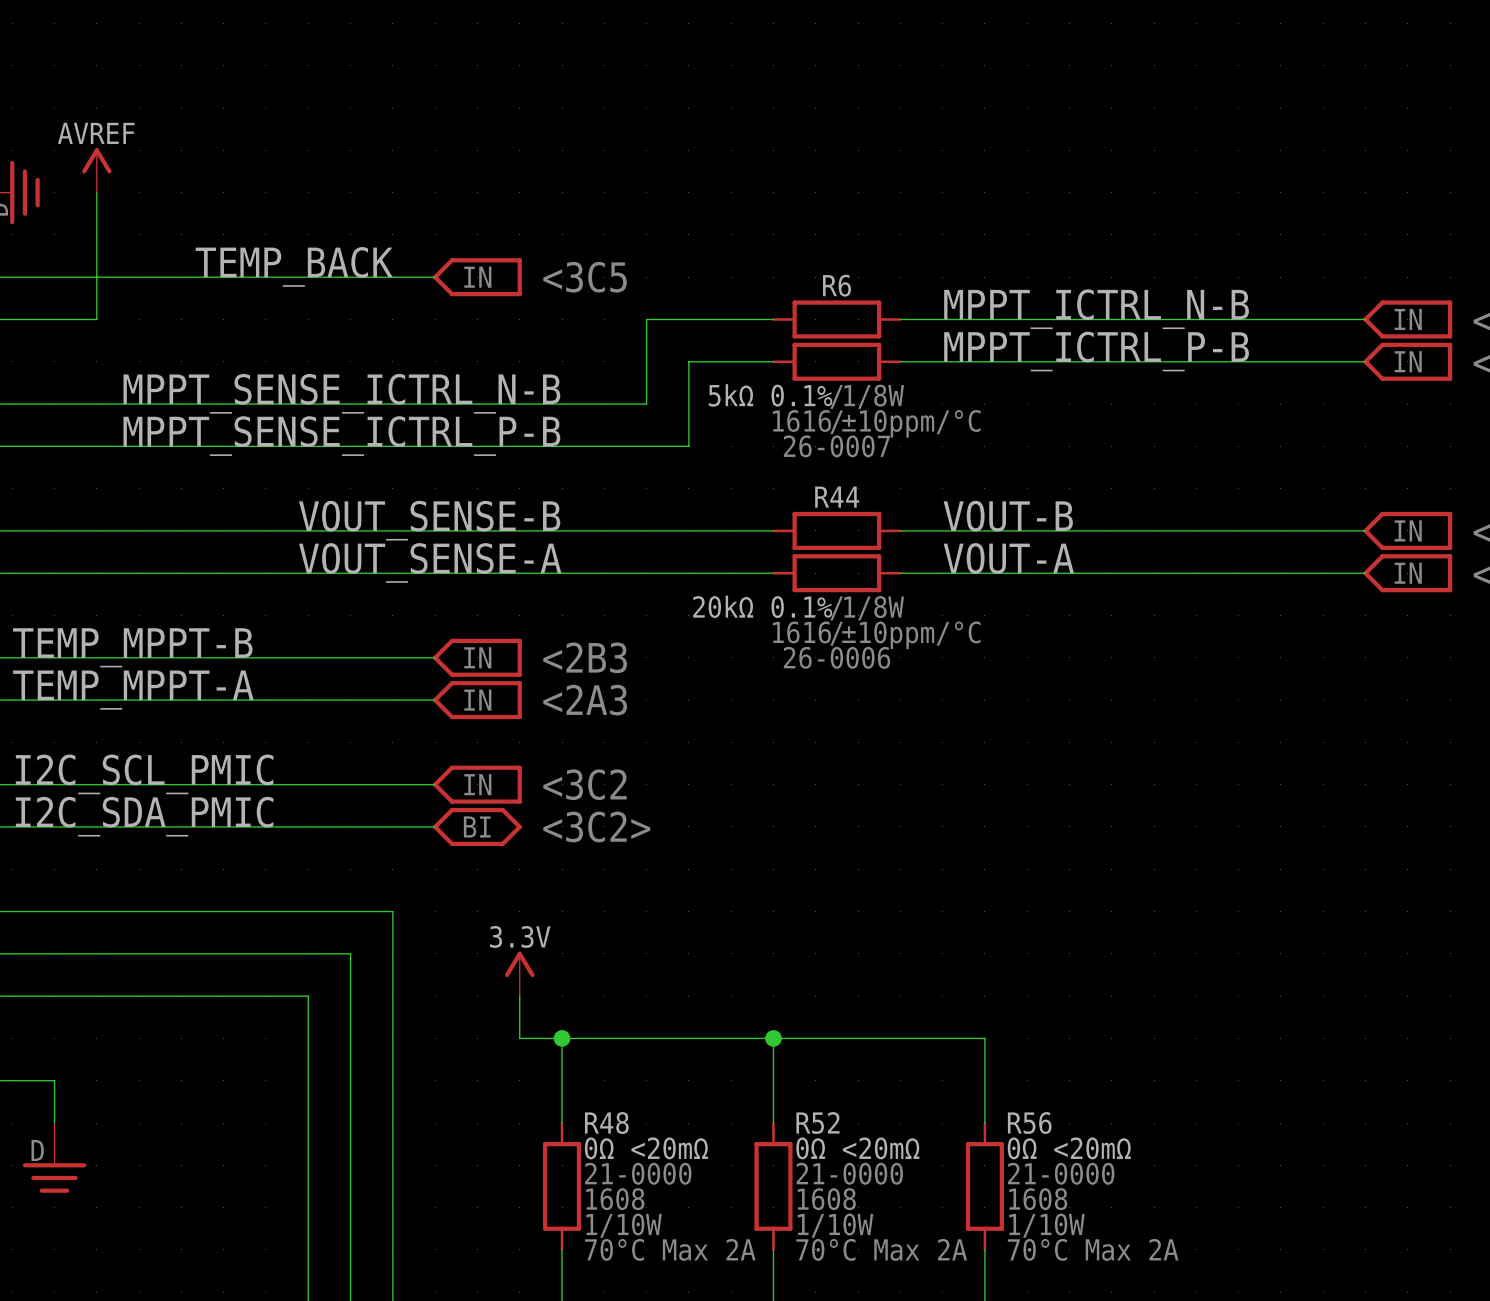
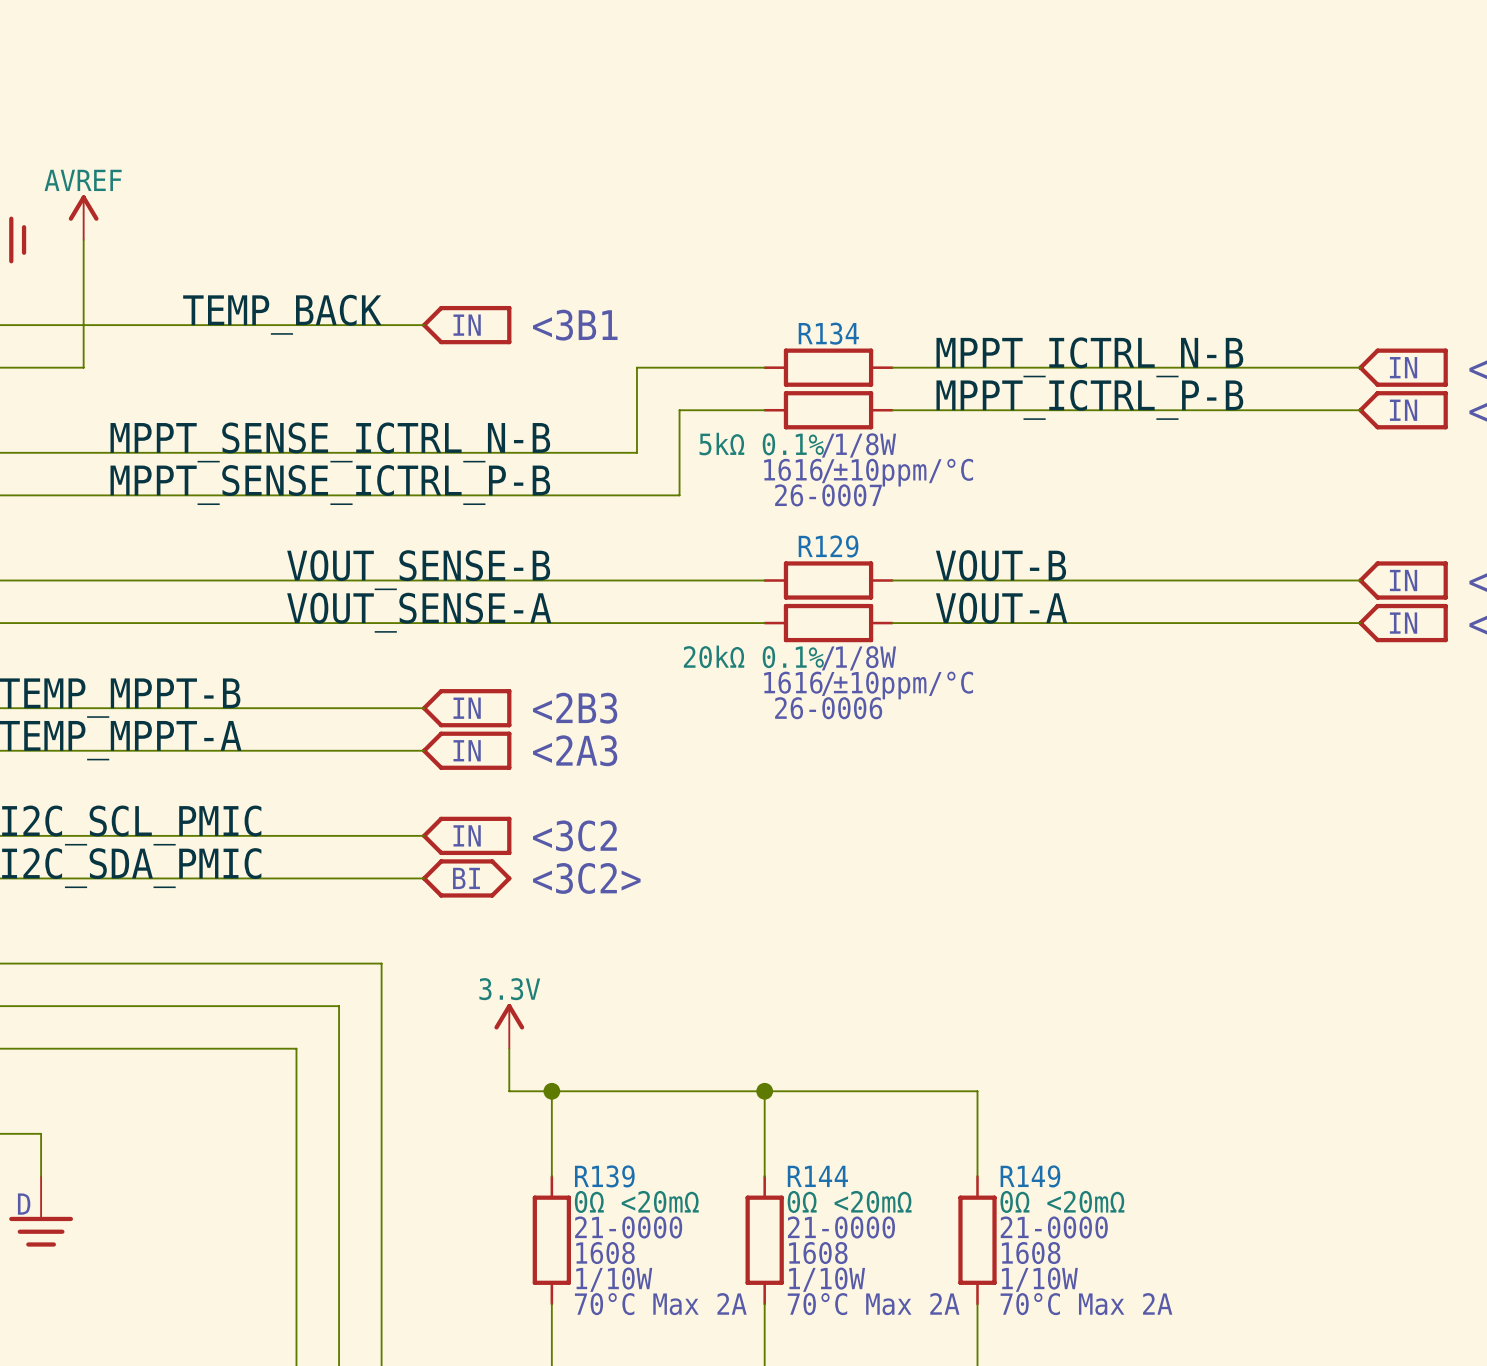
text: <3C5 (585, 277) -> <3B1 (575, 325)
R6 name: R6 (836, 285) -> R134 (828, 333)
R44 name: R44 (837, 497) -> R129 (828, 546)
R48 name: R48 (606, 1123) -> R139 (604, 1176)
R52 name: R52 (817, 1123) -> R144 (817, 1176)
R56 name: R56 (1029, 1123) -> R149 (1030, 1176)

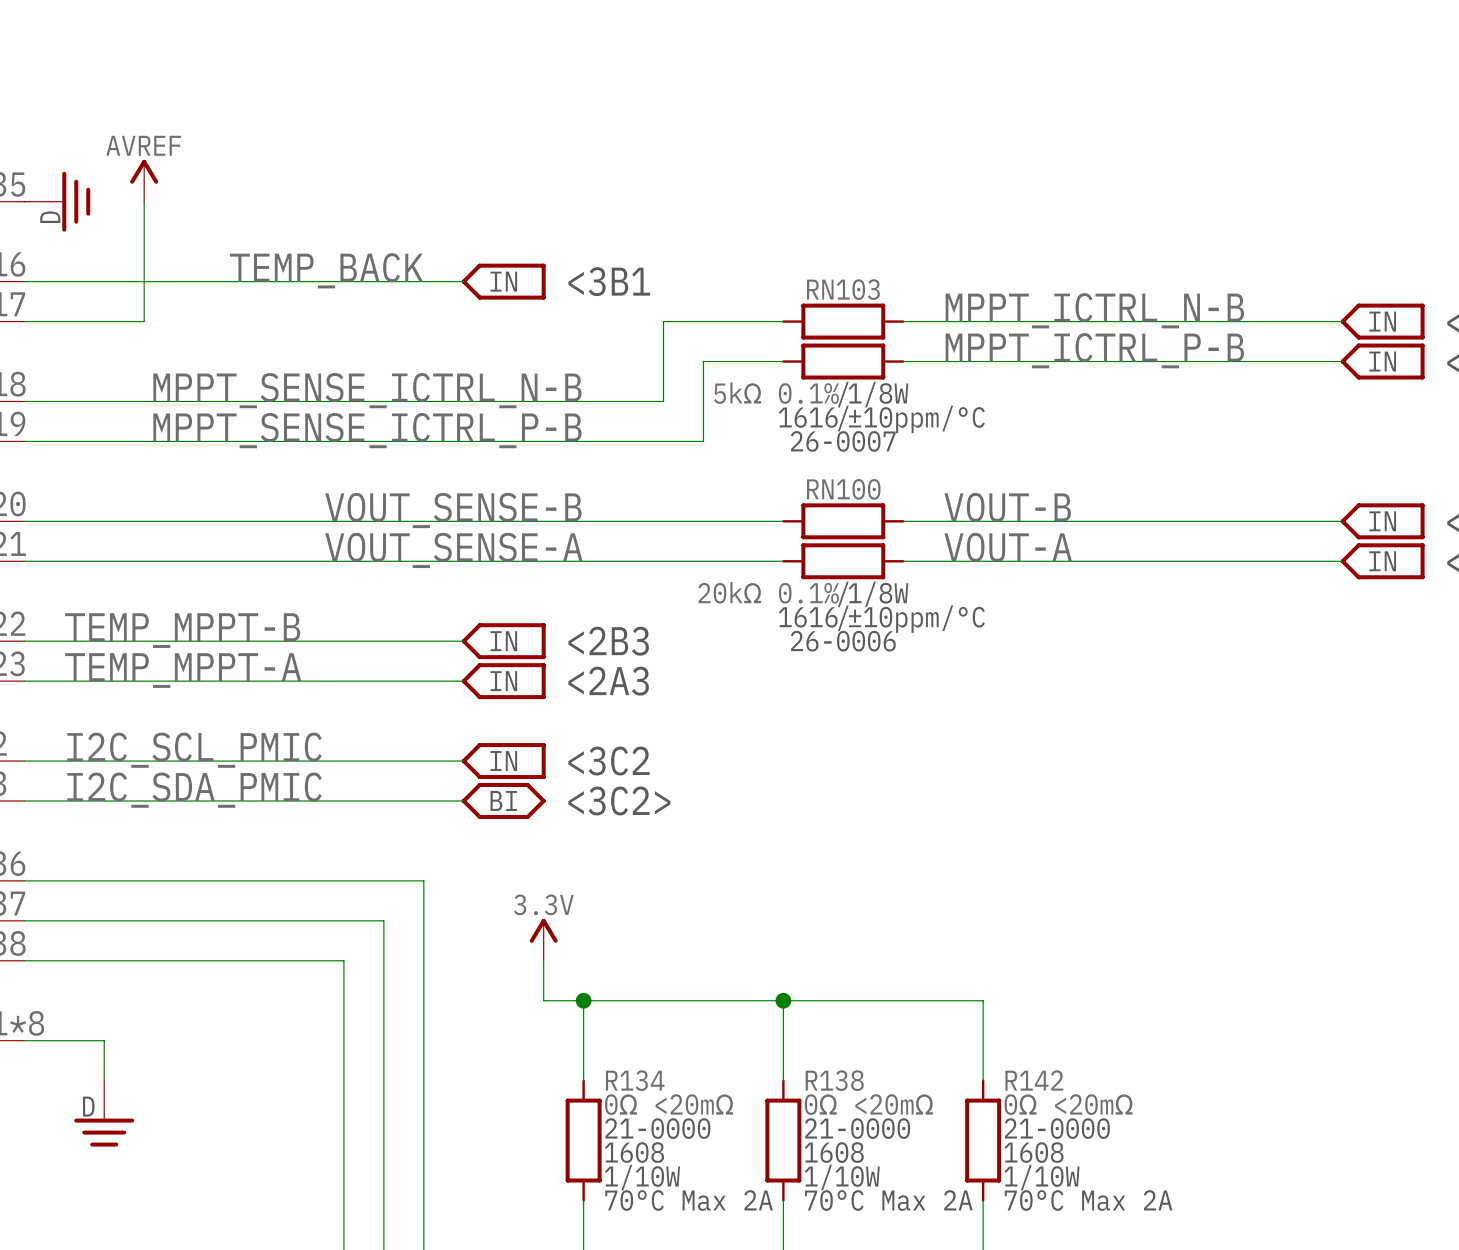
R134 name: R134 (828, 333) -> RN103 (843, 289)
R129 name: R129 (828, 546) -> RN100 (843, 489)
R139 name: R139 (604, 1176) -> R134 (635, 1080)
R144 name: R144 (817, 1176) -> R138 (834, 1080)
R149 name: R149 (1030, 1176) -> R142 (1034, 1080)

